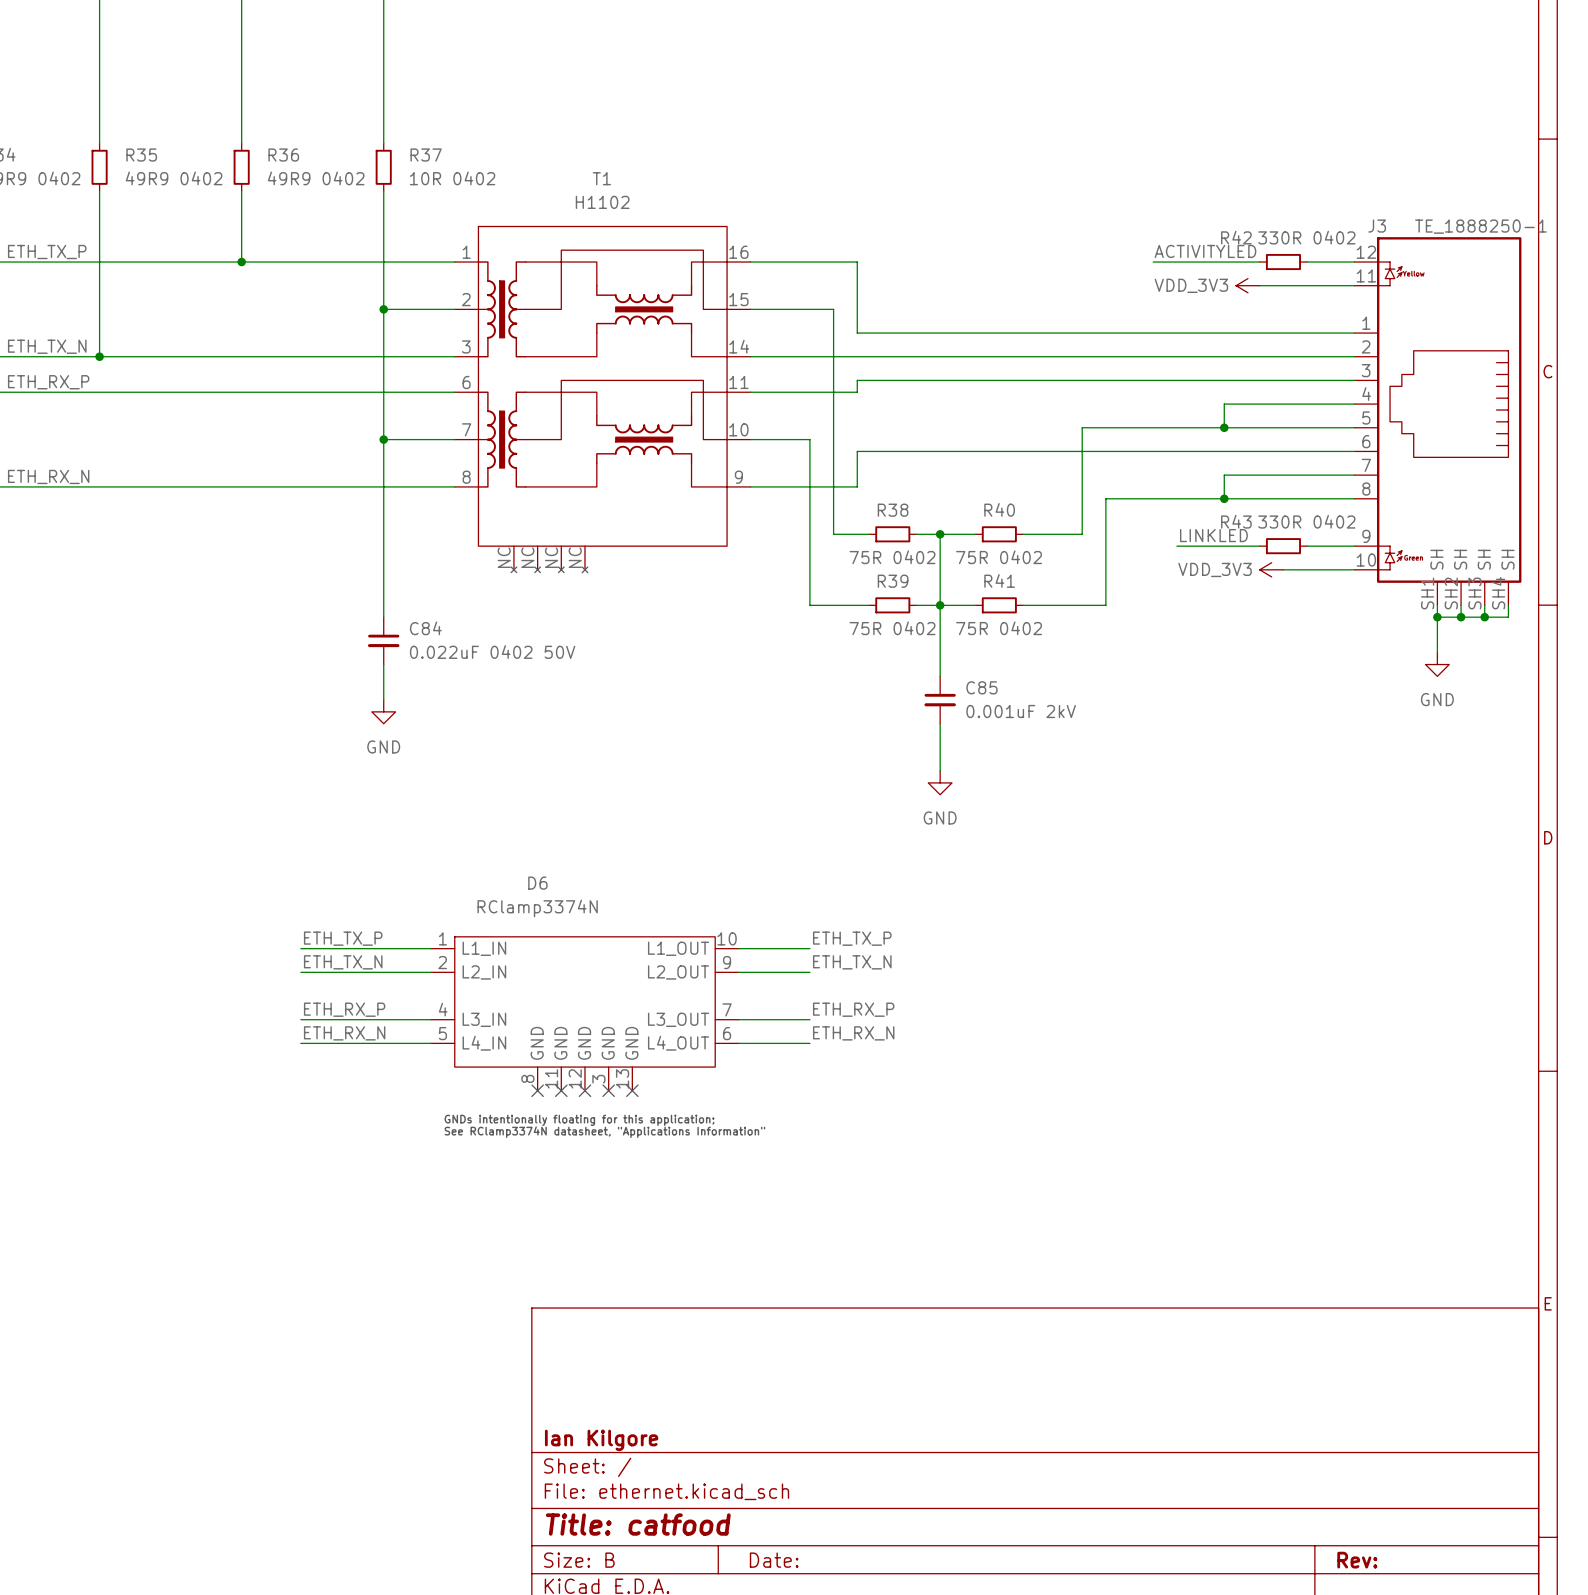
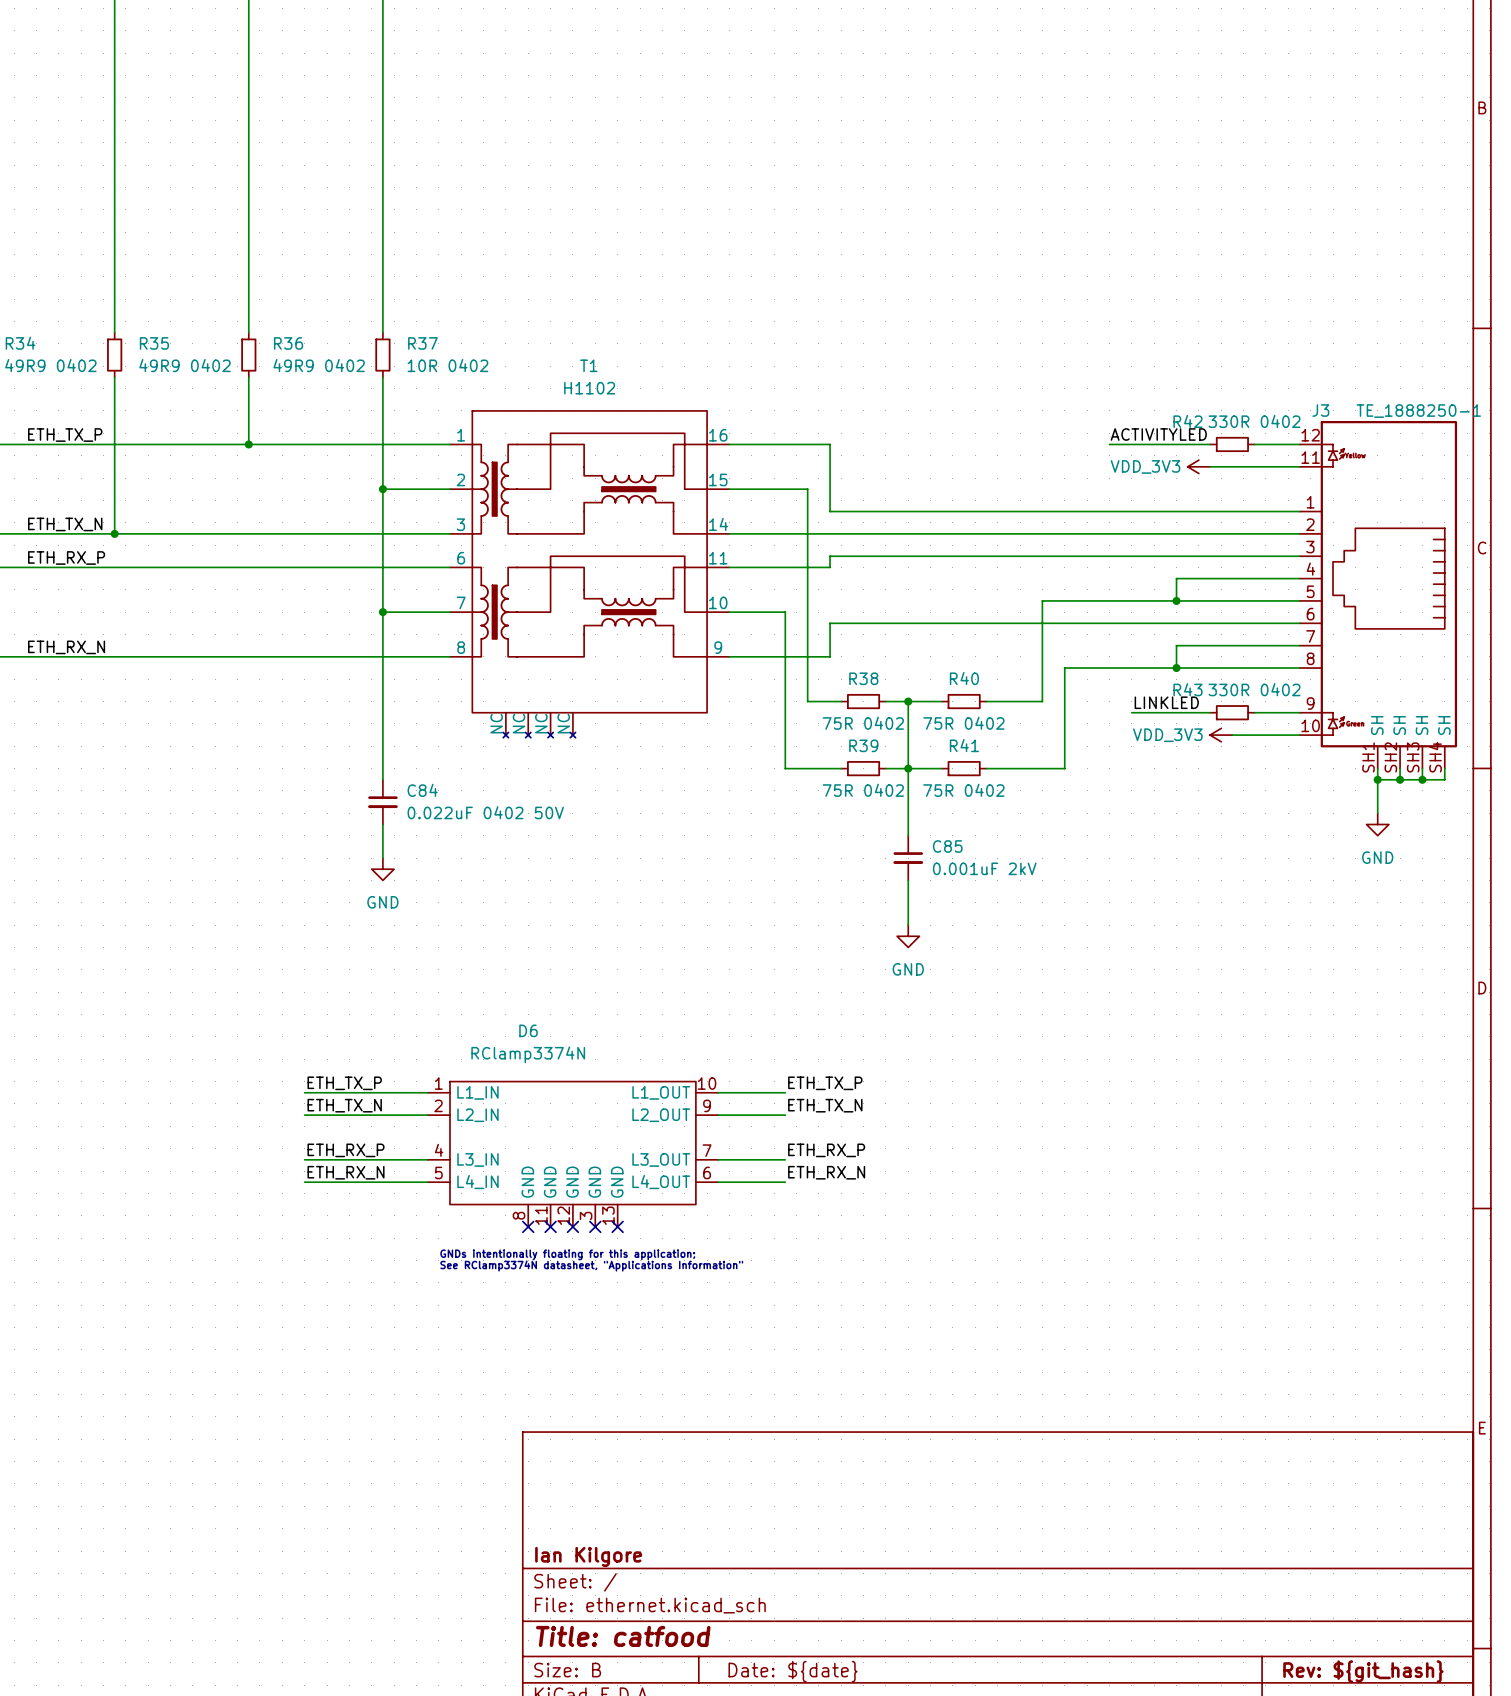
title block: Date: (774, 1560) -> Date: ${date} (793, 1671)
title block: Rev: (1357, 1560) -> Rev: ${git_hash} (1363, 1671)

